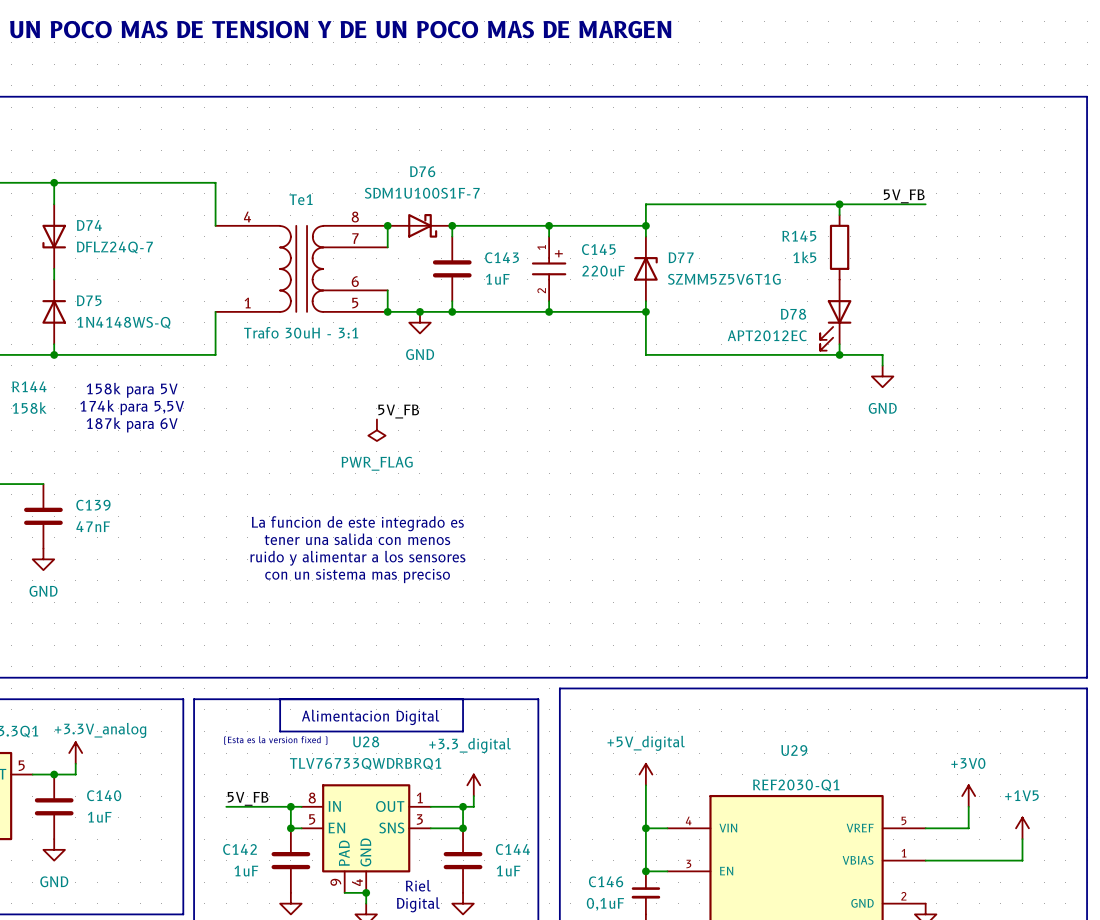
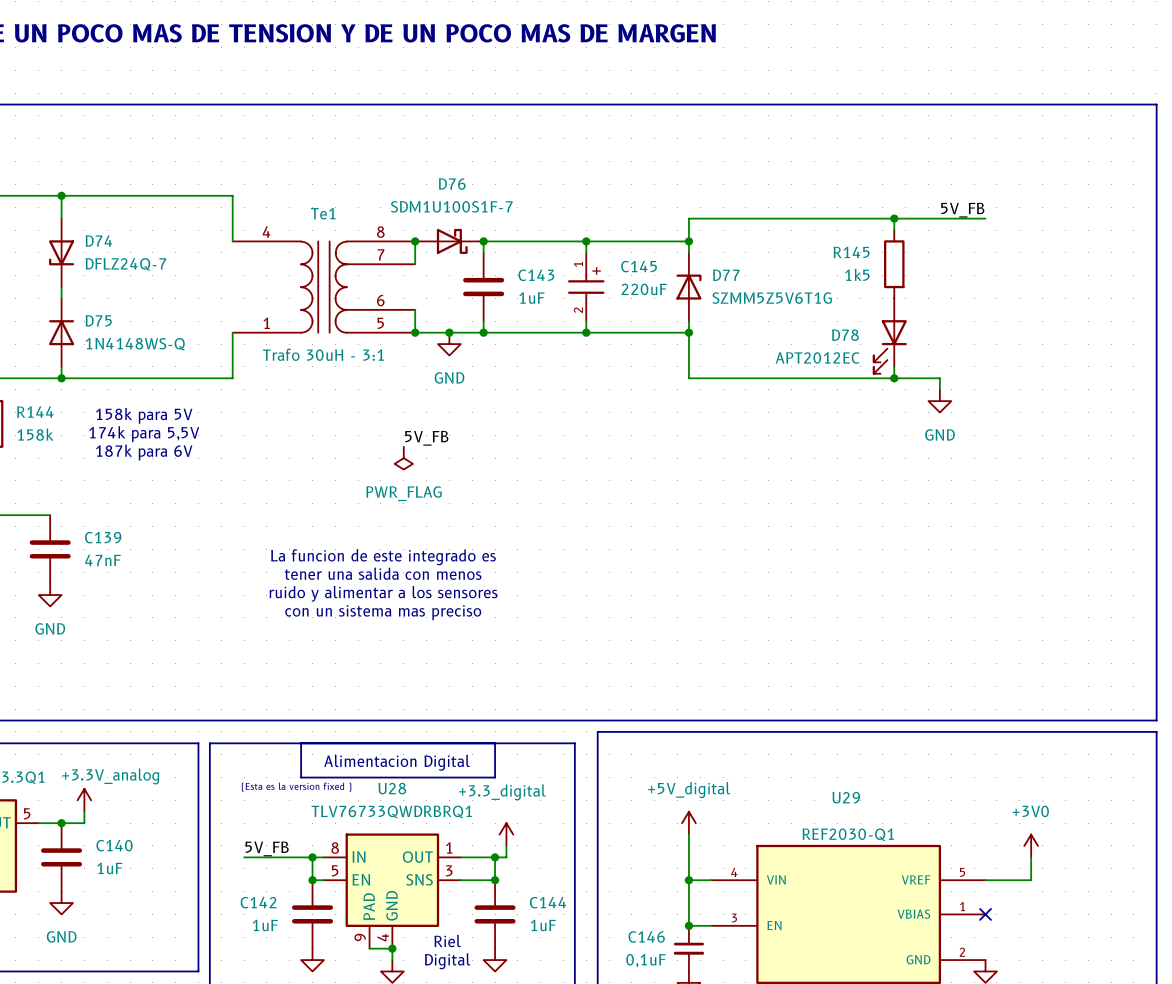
power symbol: +1V5 (1022, 828) -> none
wire: (1022, 839) (1022, 860) (925, 860) -> none
no-connect mark: none -> (985, 914)

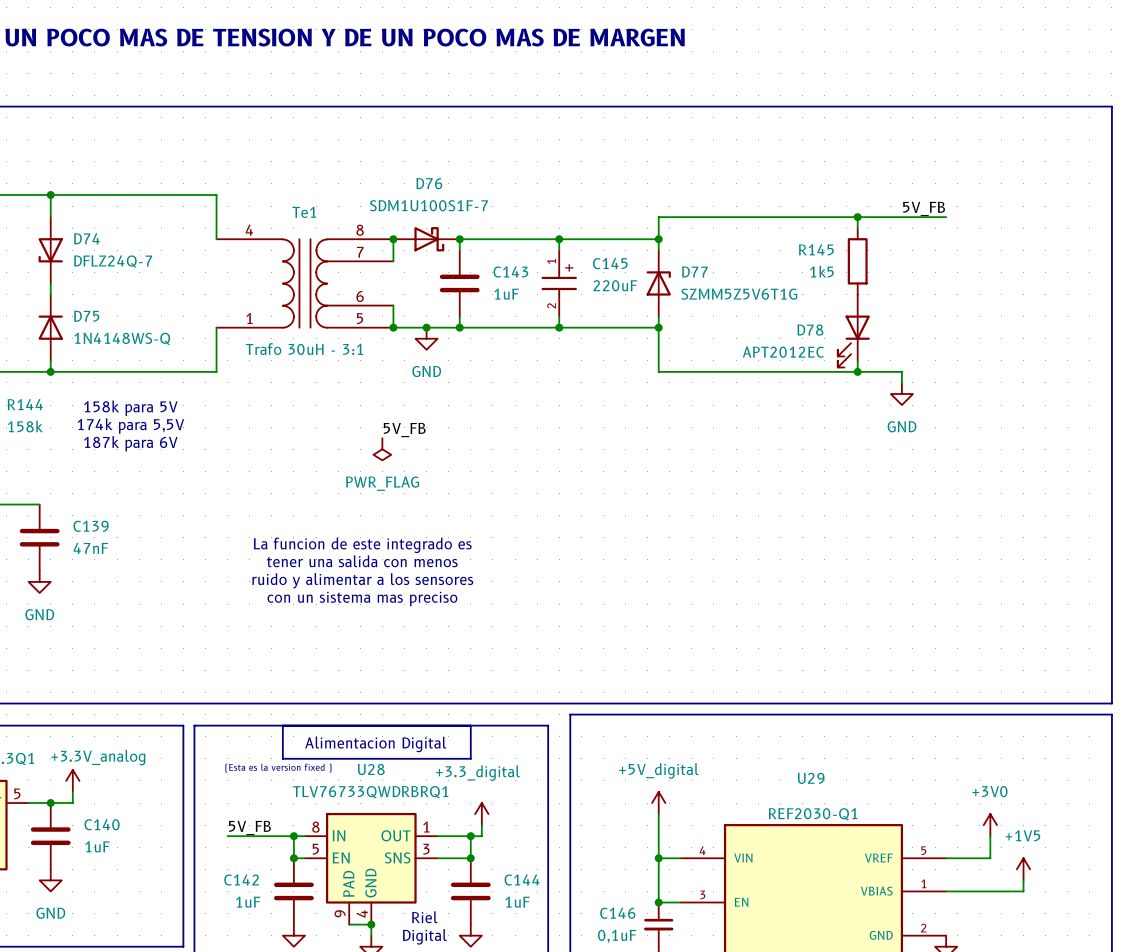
power symbol: none -> +1V5 (1023, 869)
wire: none -> (1023, 880) (1023, 891) (946, 891)
no-connect mark: (985, 914) -> none

